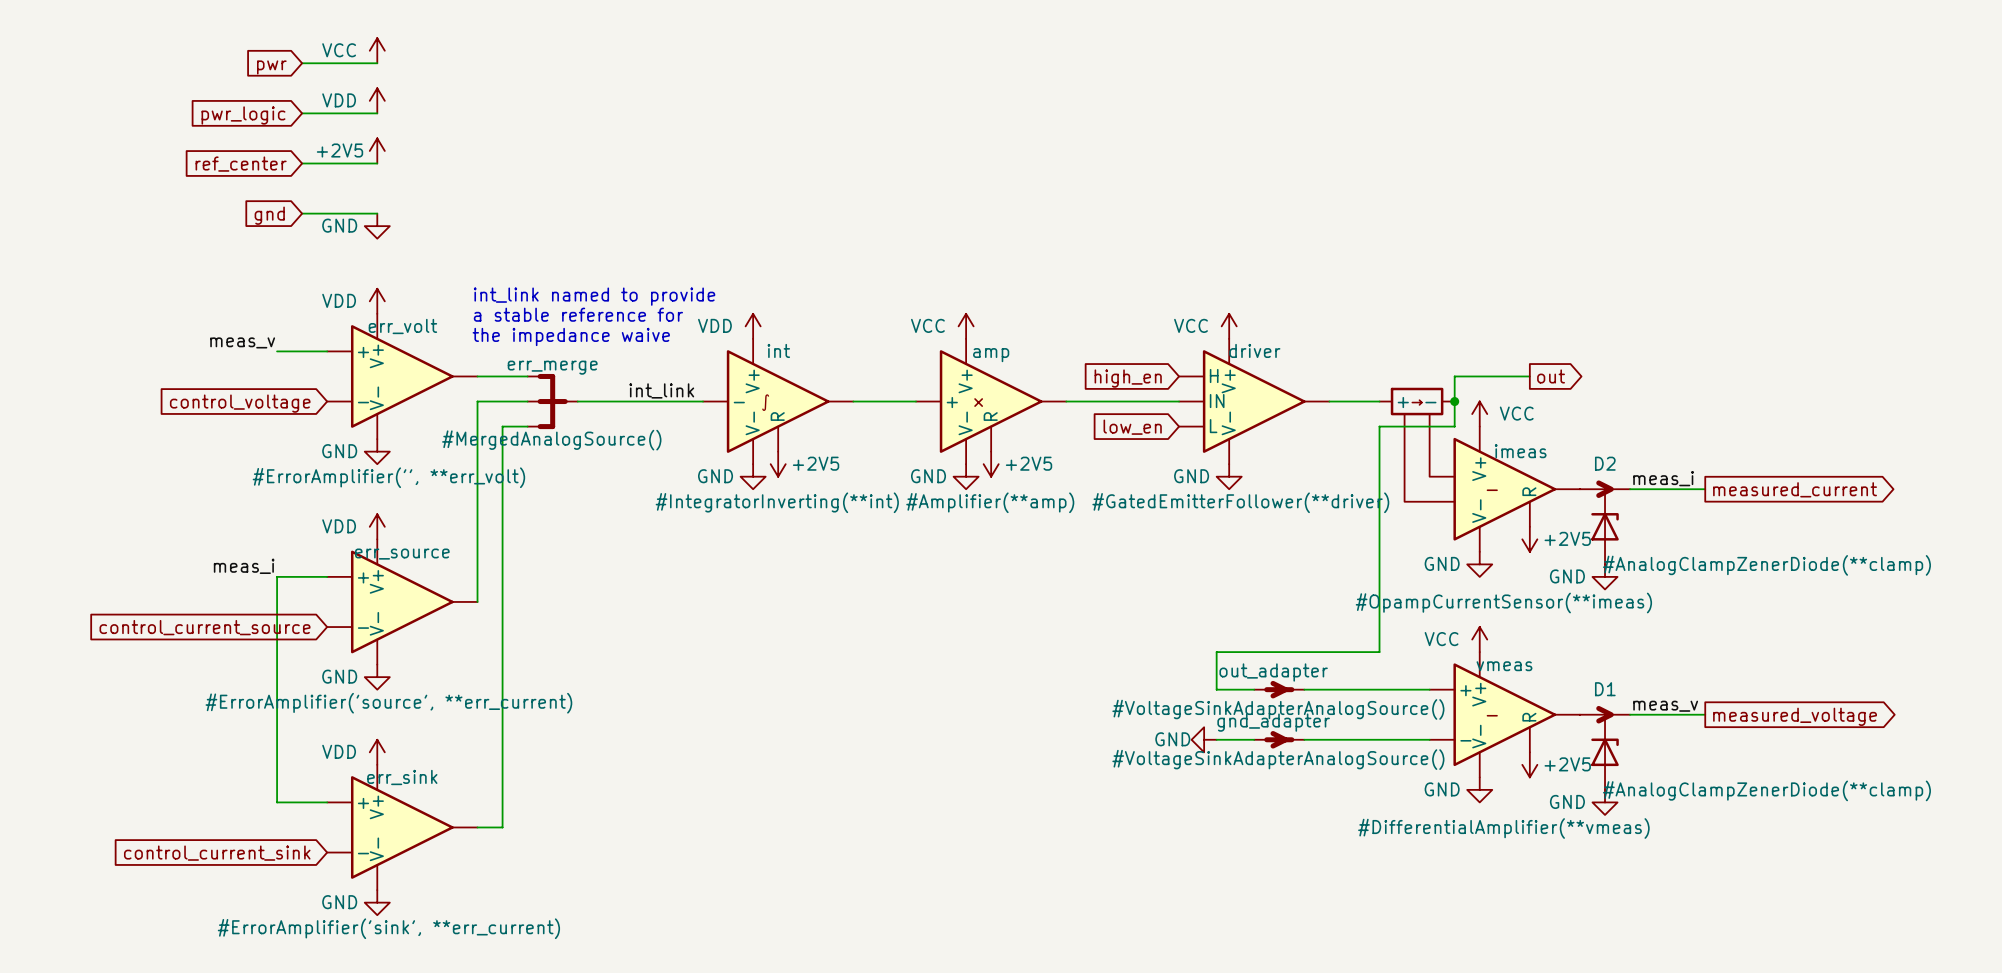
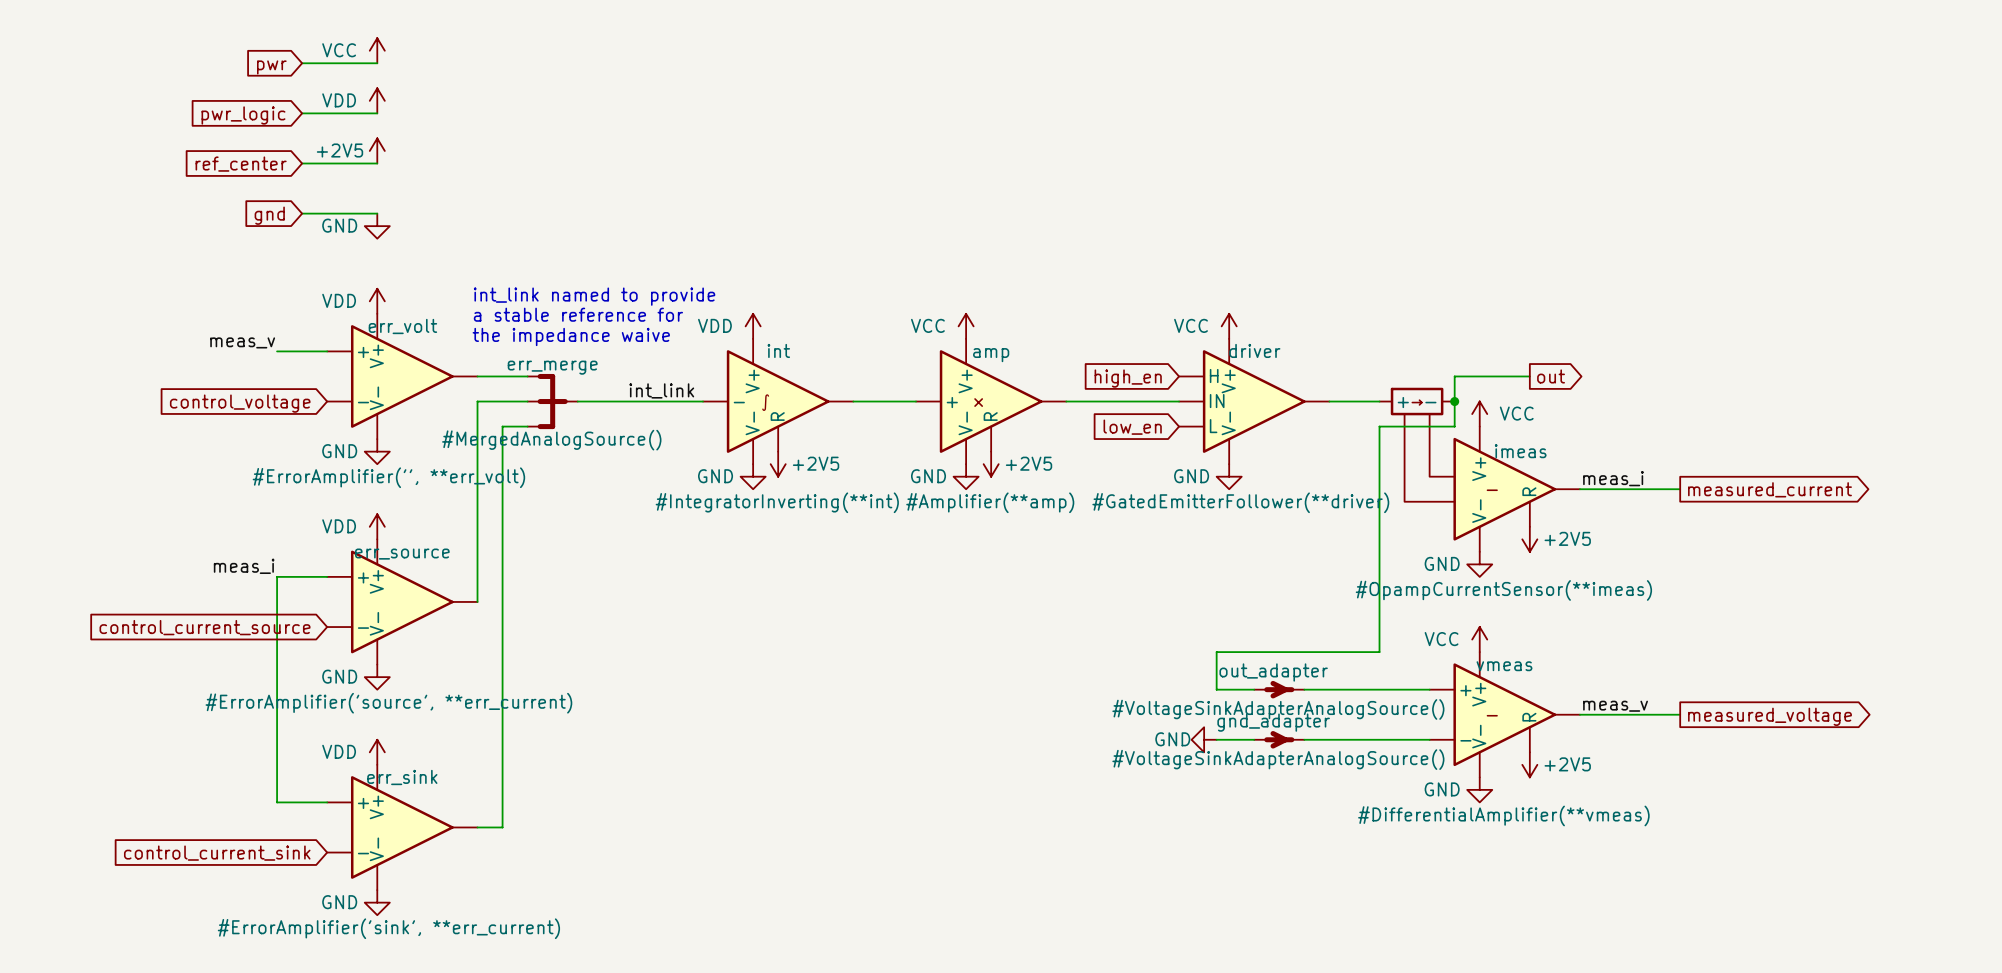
label position: meas_i (1663, 478) -> meas_i (1613, 478)
wire: (1680, 489) (1705, 489) -> none
global label position: measured_current (1795, 489) -> measured_current (1769, 489)
D2: #AnalogClampZenerDiode(**clamp) (1605, 522) -> none
power symbol: GND (1605, 576) -> none
imeas value position: #OpampCurrentSensor(**imeas) (1503, 602) -> #OpampCurrentSensor(**imeas) (1503, 590)
label position: meas_v (1665, 706) -> meas_v (1615, 706)
wire: (1680, 714) (1705, 714) -> none
global label position: measured_voltage (1795, 716) -> measured_voltage (1769, 716)
D1: #AnalogClampZenerDiode(**clamp) (1605, 747) -> none
power symbol: GND (1605, 802) -> none
vmeas value position: #DifferentialAmplifier(**vmeas) (1503, 828) -> #DifferentialAmplifier(**vmeas) (1503, 815)

